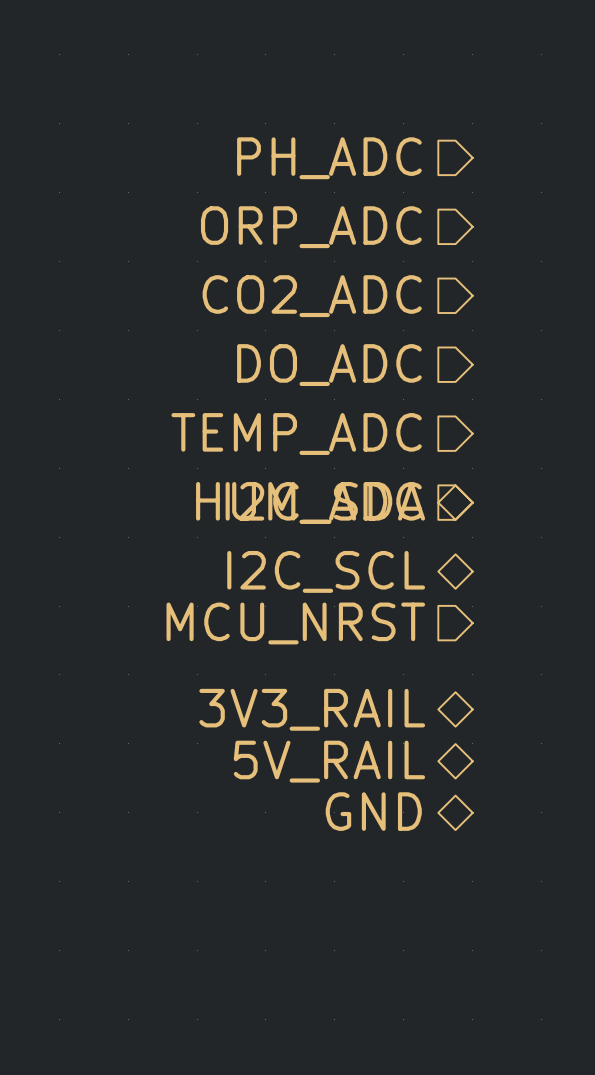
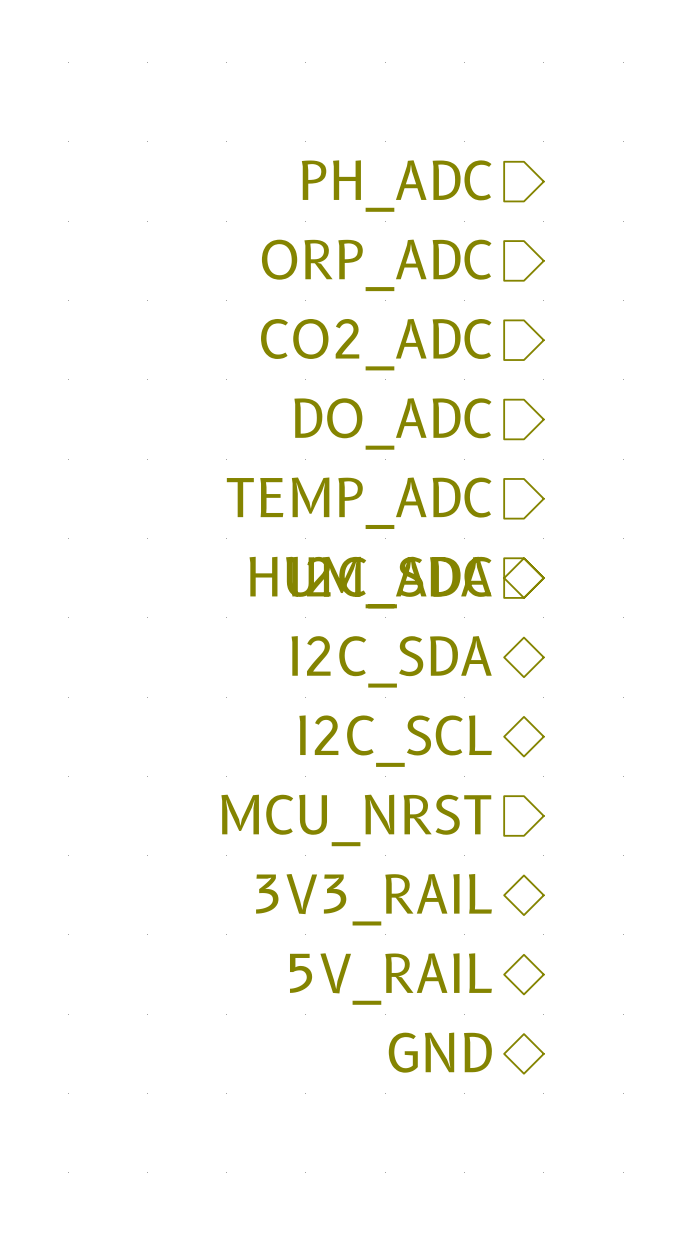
hierarchical label: I2C_SCL (326, 571) -> I2C_SDA (391, 661)
hierarchical label shape: input (295, 623) -> bidirectional (395, 741)
hierarchical label: MCU_NRST (295, 623) -> I2C_SCL (395, 741)
hierarchical label shape: bidirectional (312, 709) -> input (356, 820)
hierarchical label: 3V3_RAIL (312, 709) -> MCU_NRST (356, 820)
hierarchical label position: 5V_RAIL (329, 761) -> 5V_RAIL (390, 979)
hierarchical label: none -> 3V3_RAIL (373, 899)
hierarchical label position: GND (373, 811) -> GND (440, 1052)

